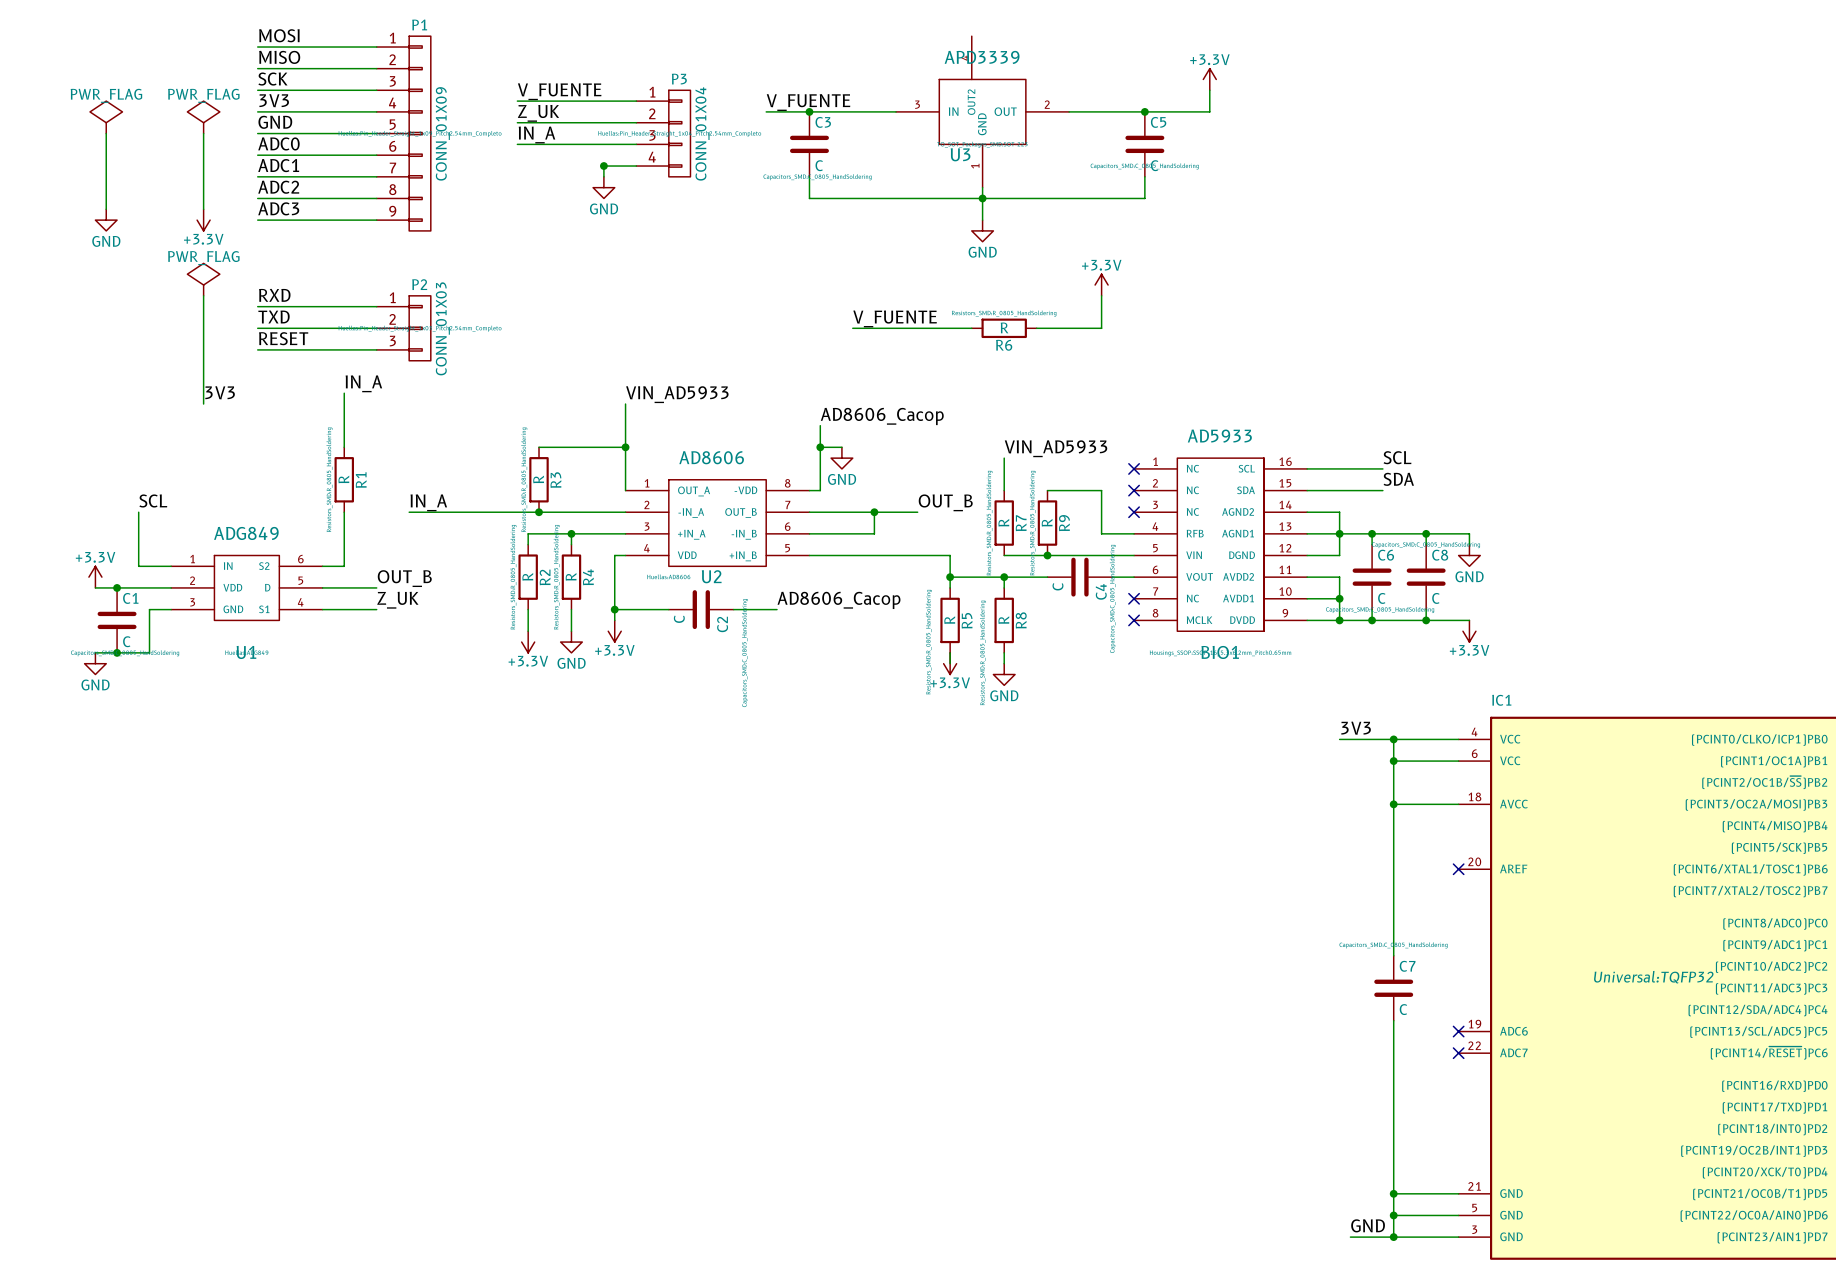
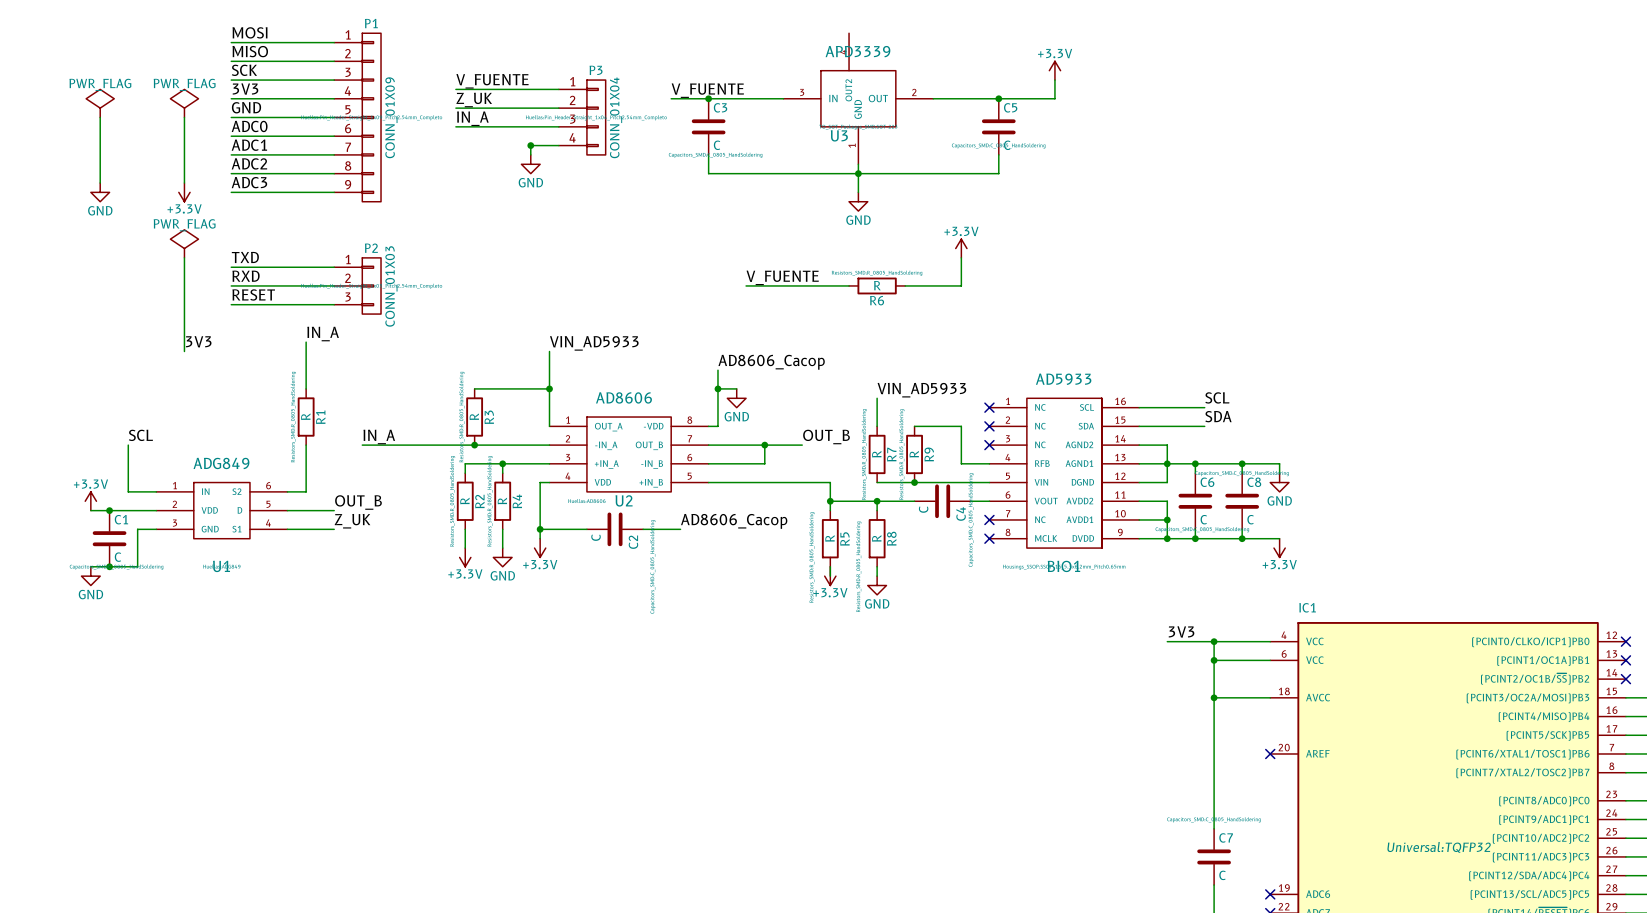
label: RXD (274, 295) -> TXD (245, 257)
label: TXD (274, 316) -> RXD (246, 276)

